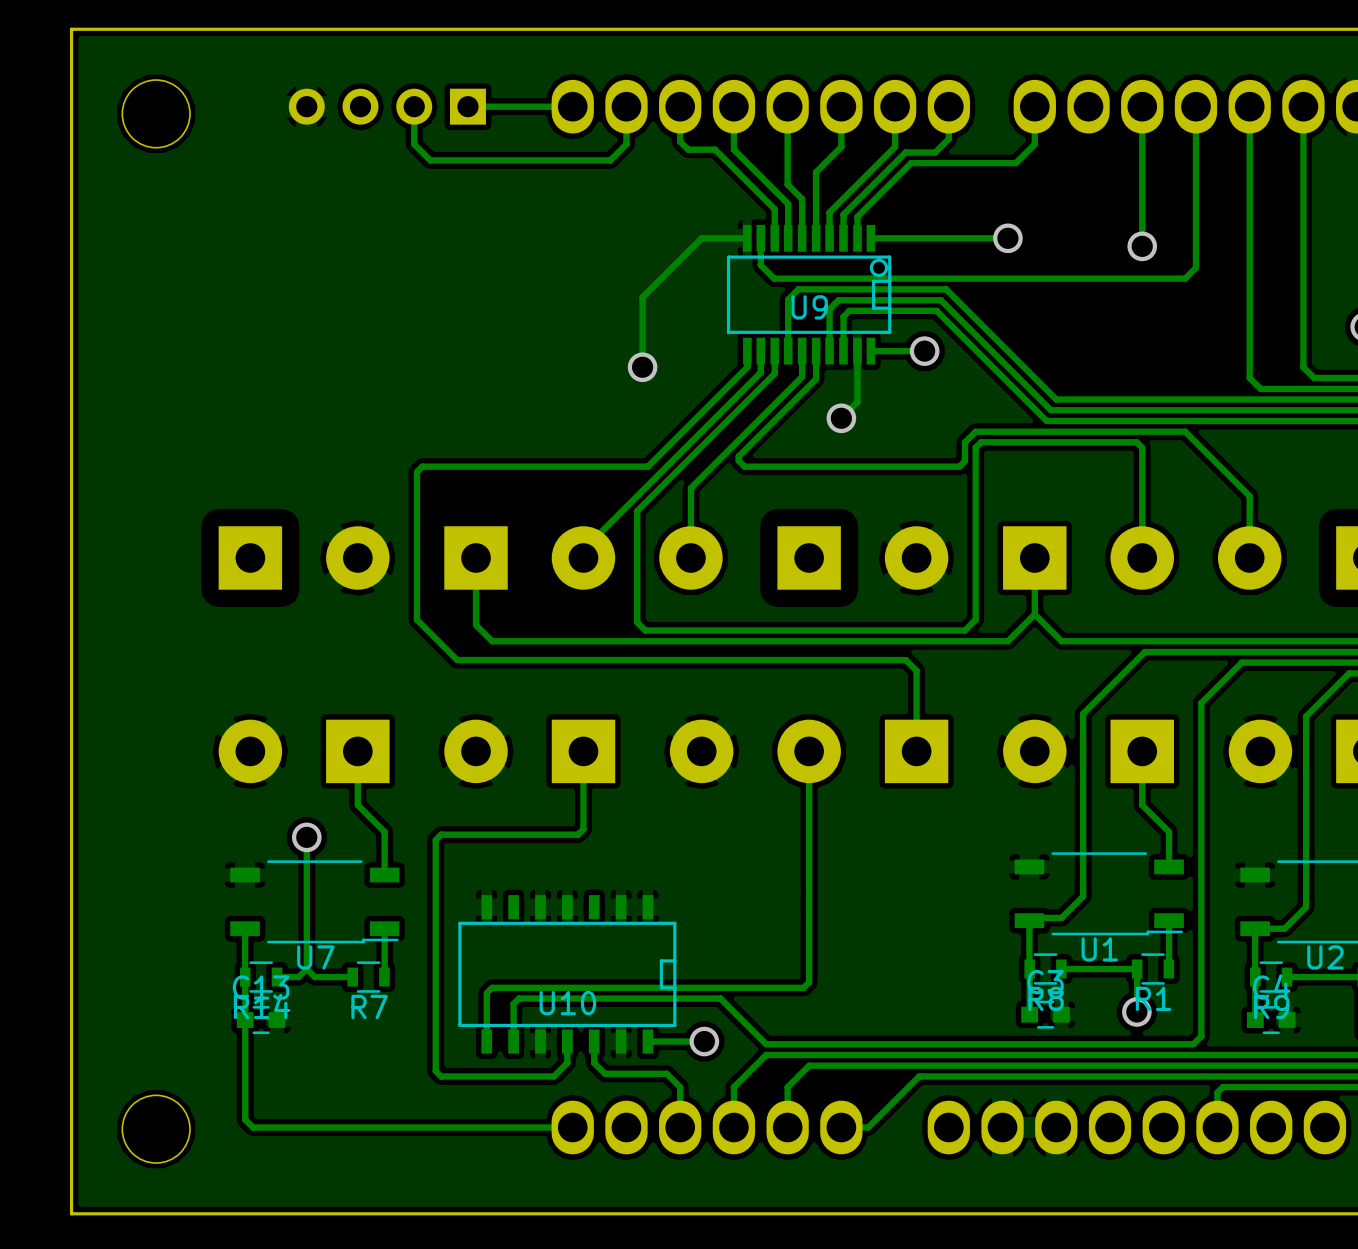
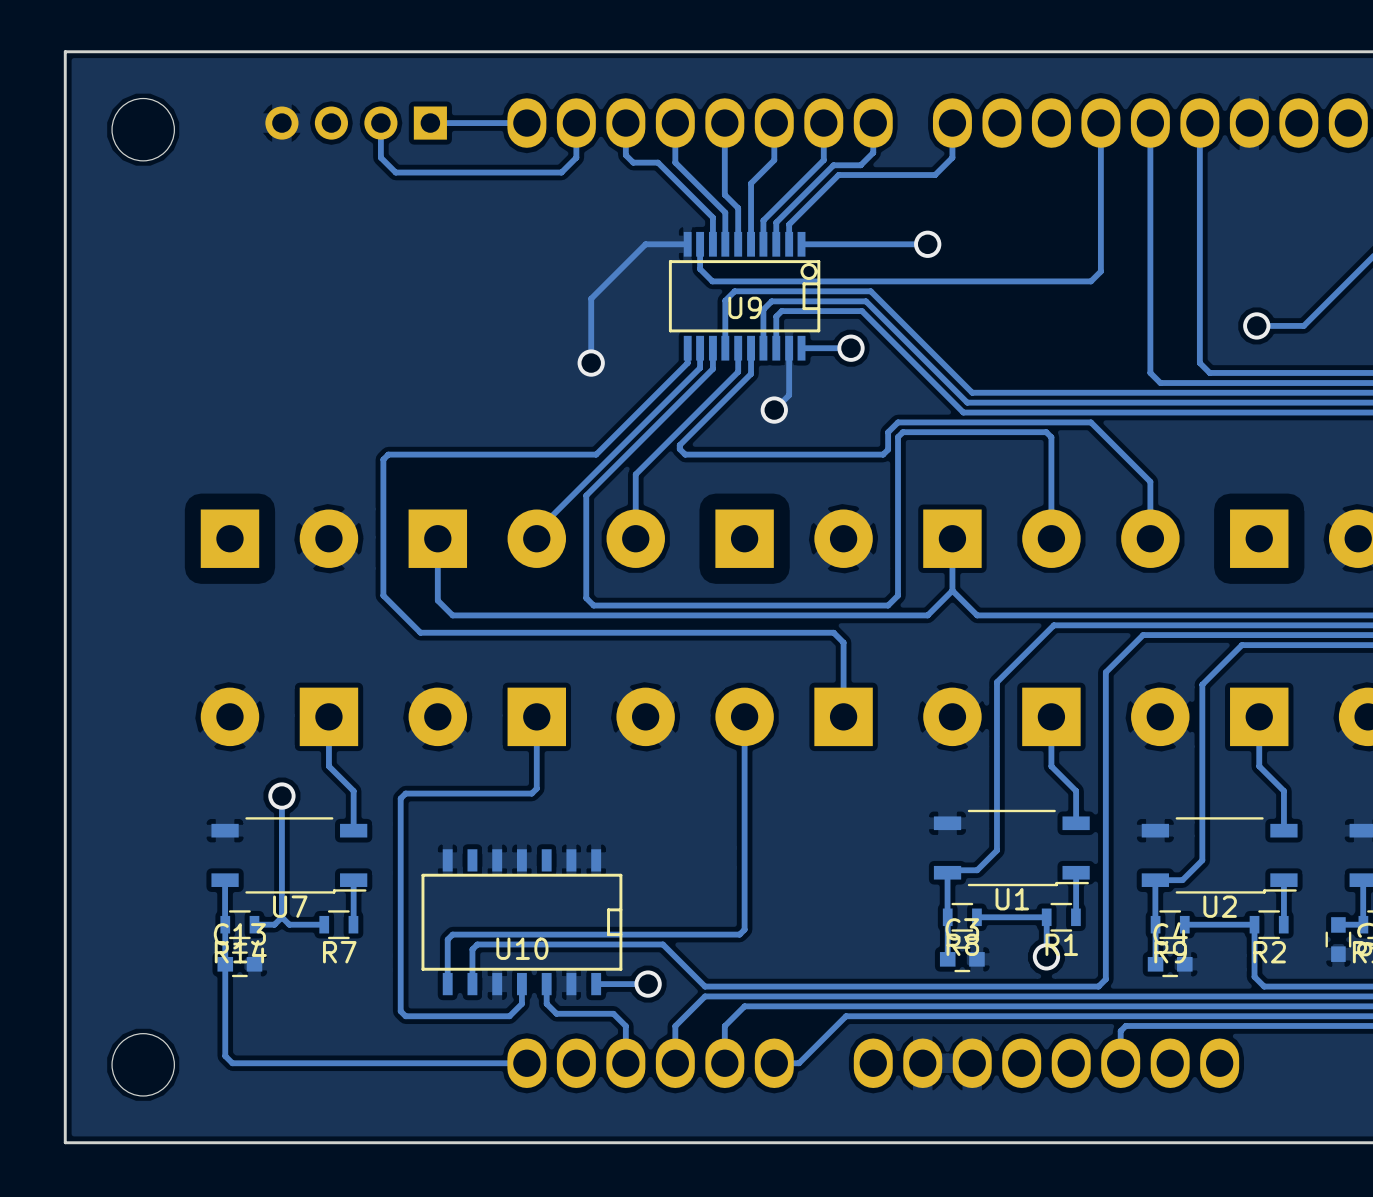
track: (1142, 106) (1142, 246) -> none
via: (1142, 246) -> none

